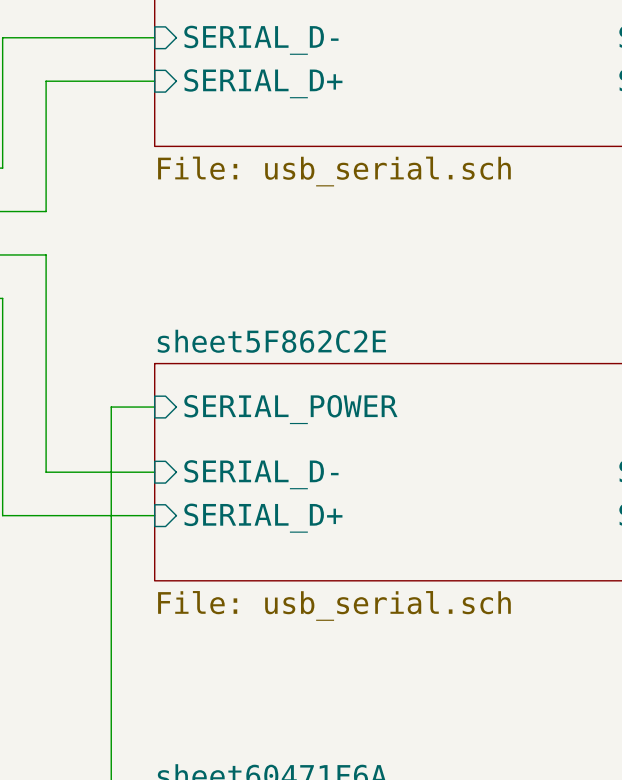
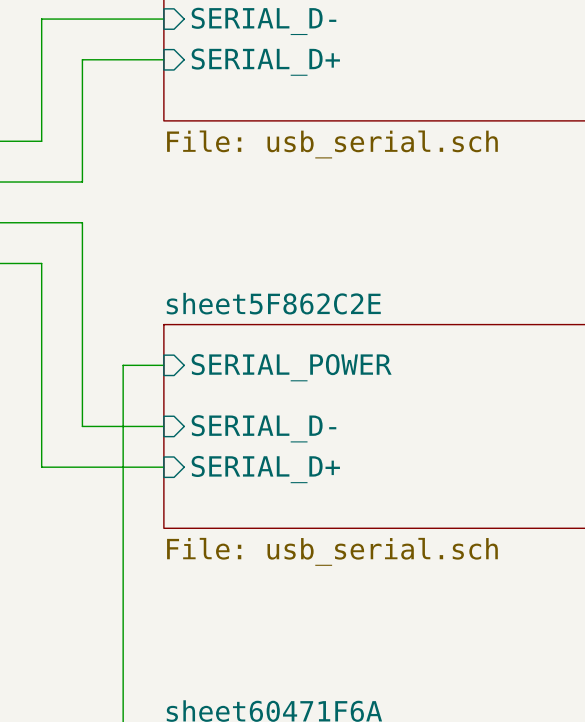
wire: (24, 37) (2, 37) (2, 168) -> (41, 19) (41, 141) (21, 141)
wire: (67, 81) (46, 81) (46, 211) -> (82, 59) (82, 182) (62, 182)
wire: (46, 254) (46, 472) (67, 472) -> (62, 222) (82, 222) (82, 426)
wire: (2, 298) (2, 515) (24, 515) -> (21, 263) (41, 263) (41, 467)

